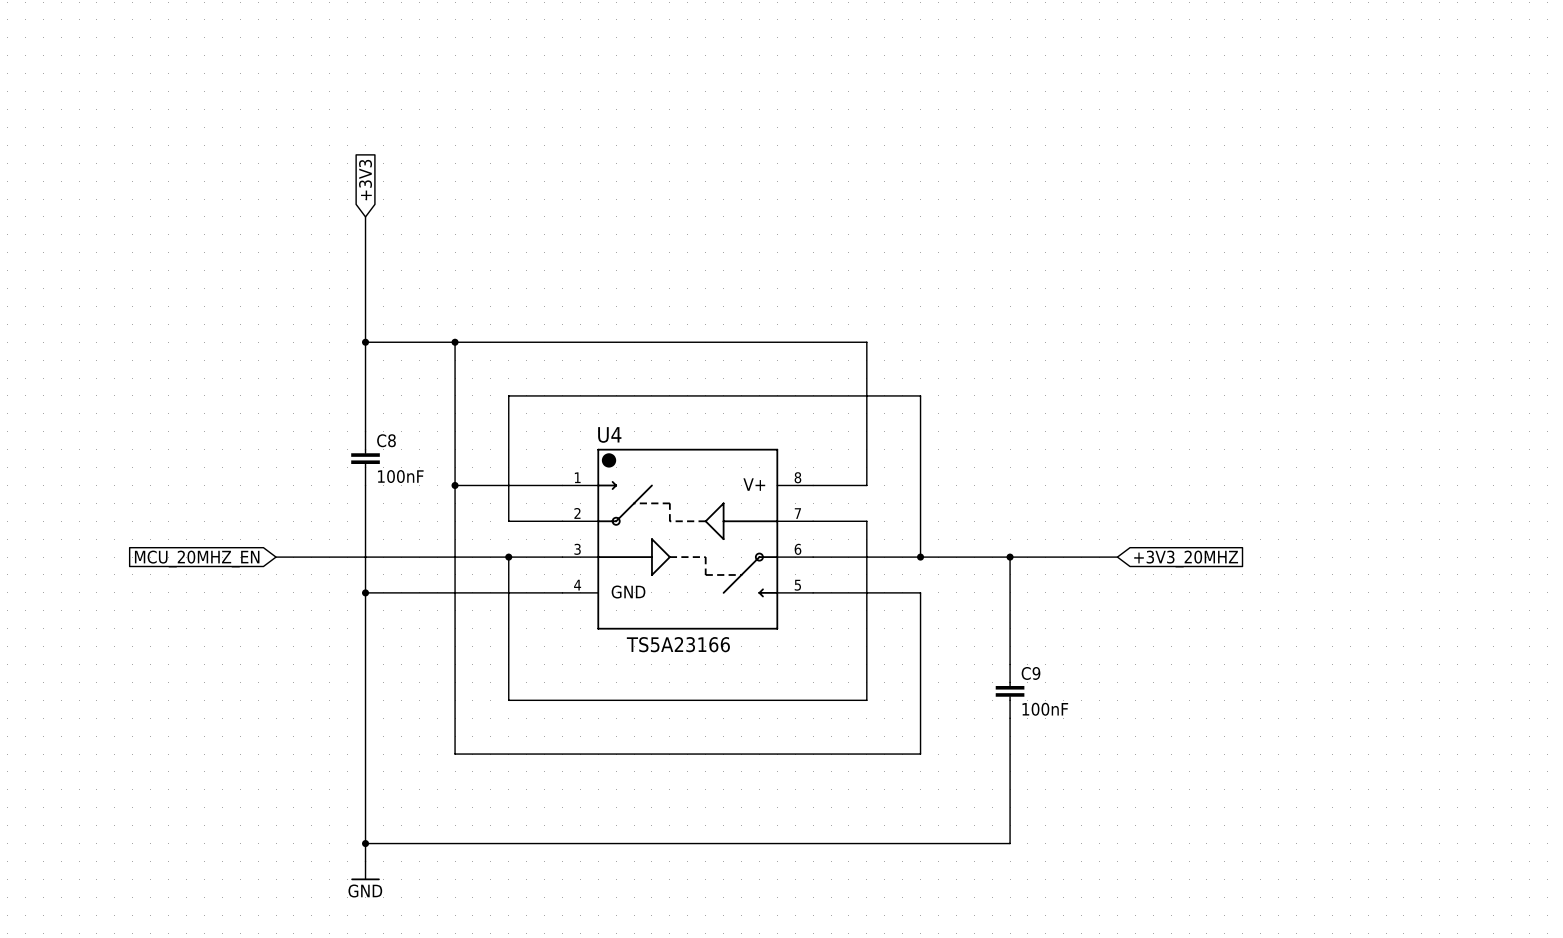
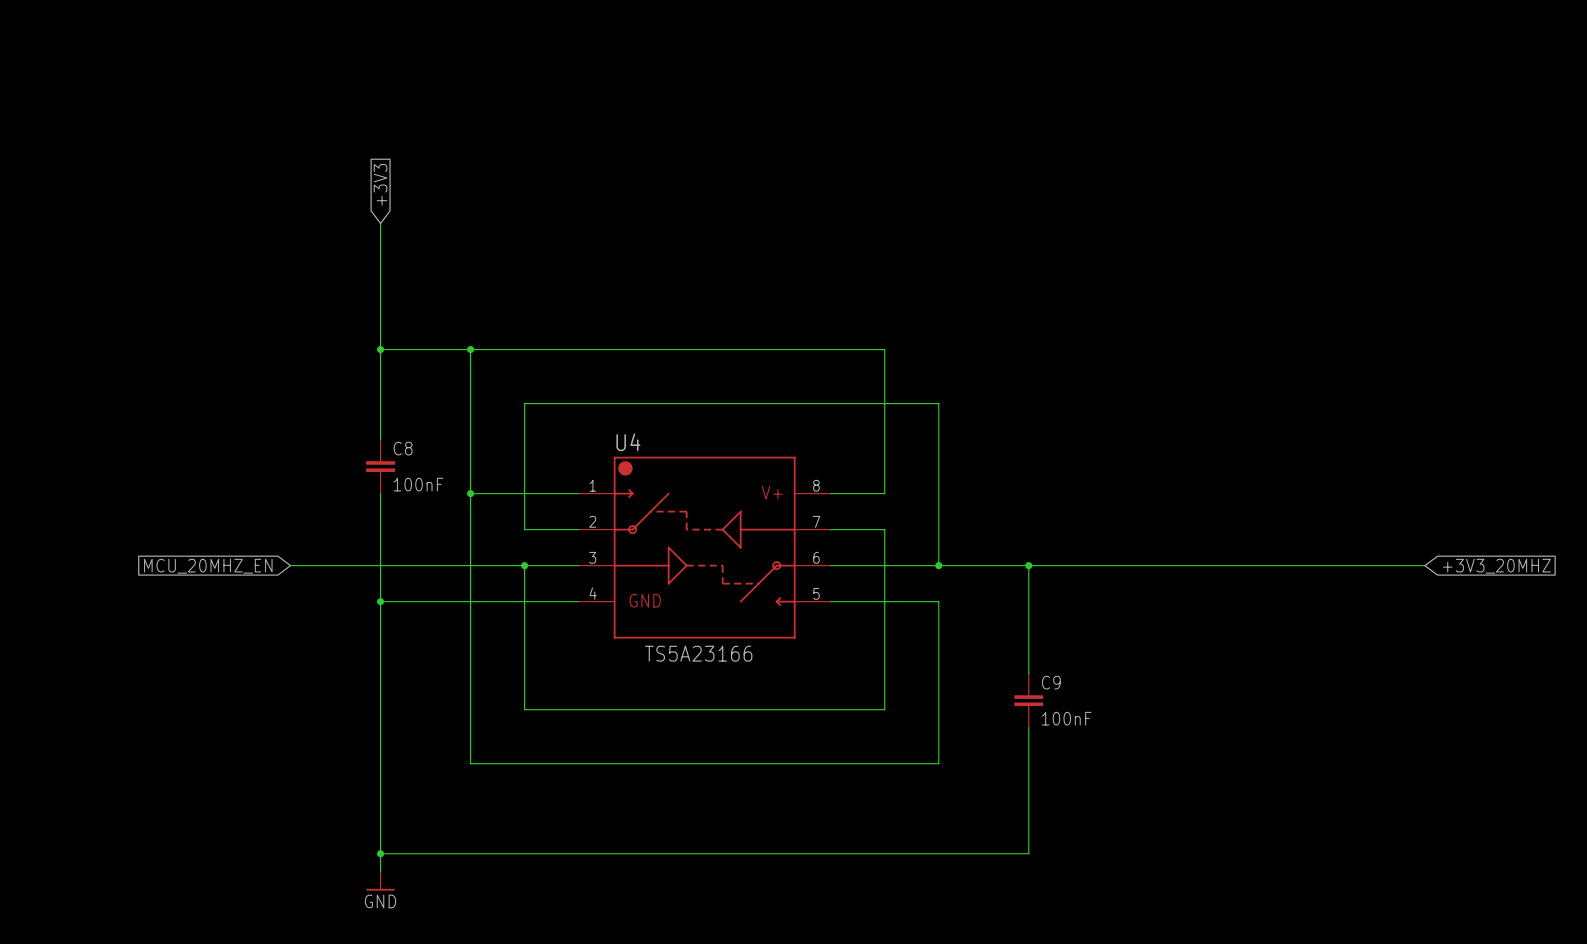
wire: none -> (1136, 565) (1424, 565)
global label: +3V3_20MHZ (1186, 559) -> none
global label: none -> +3V3_20MHZ (1496, 566)

